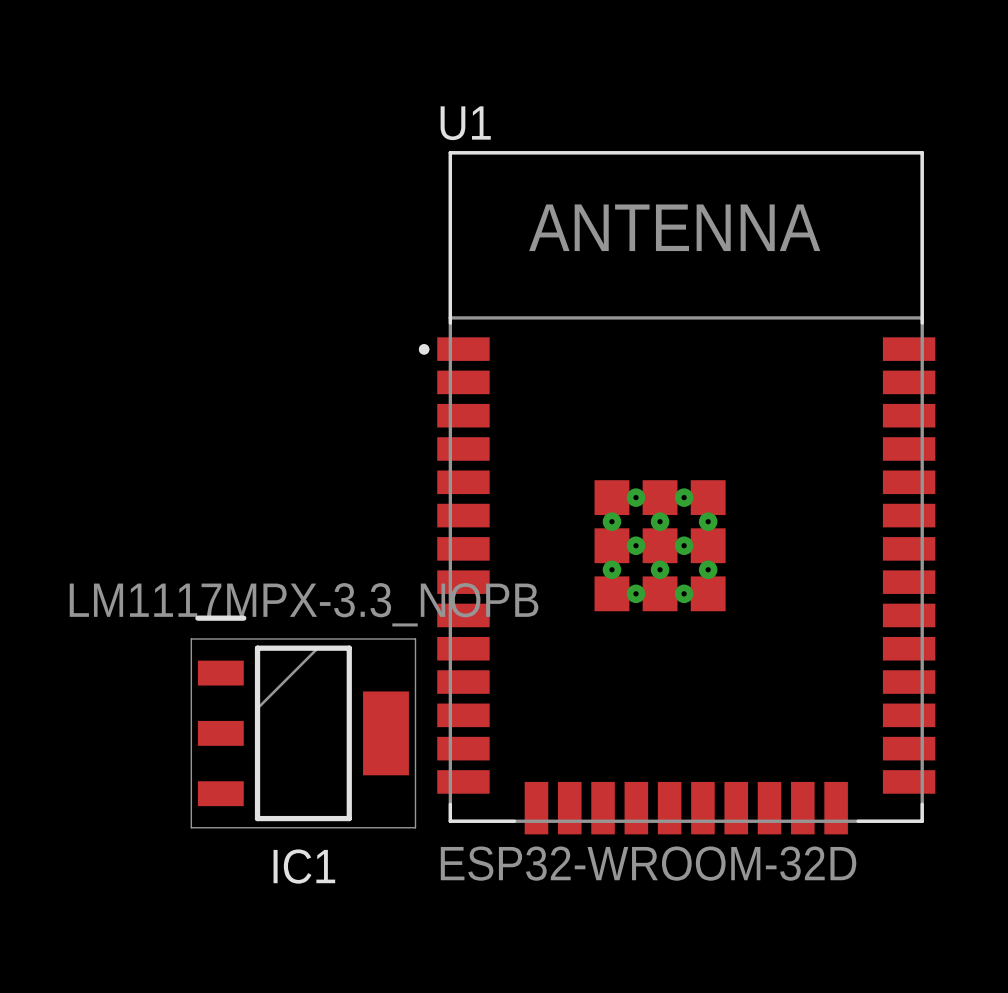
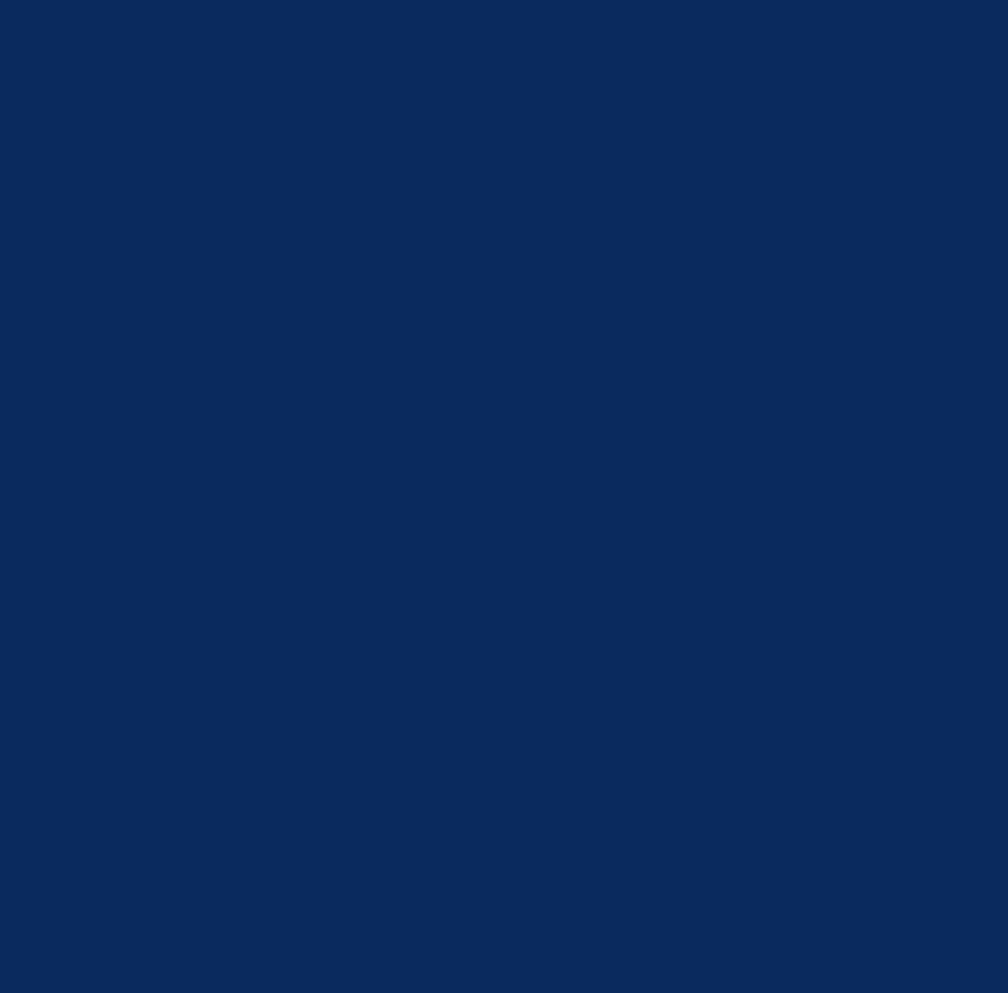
U1: ESP32-WROOM-32D (677, 492) -> none
IC1: LM1117MPX-3.3_NOPB (303, 721) -> none

